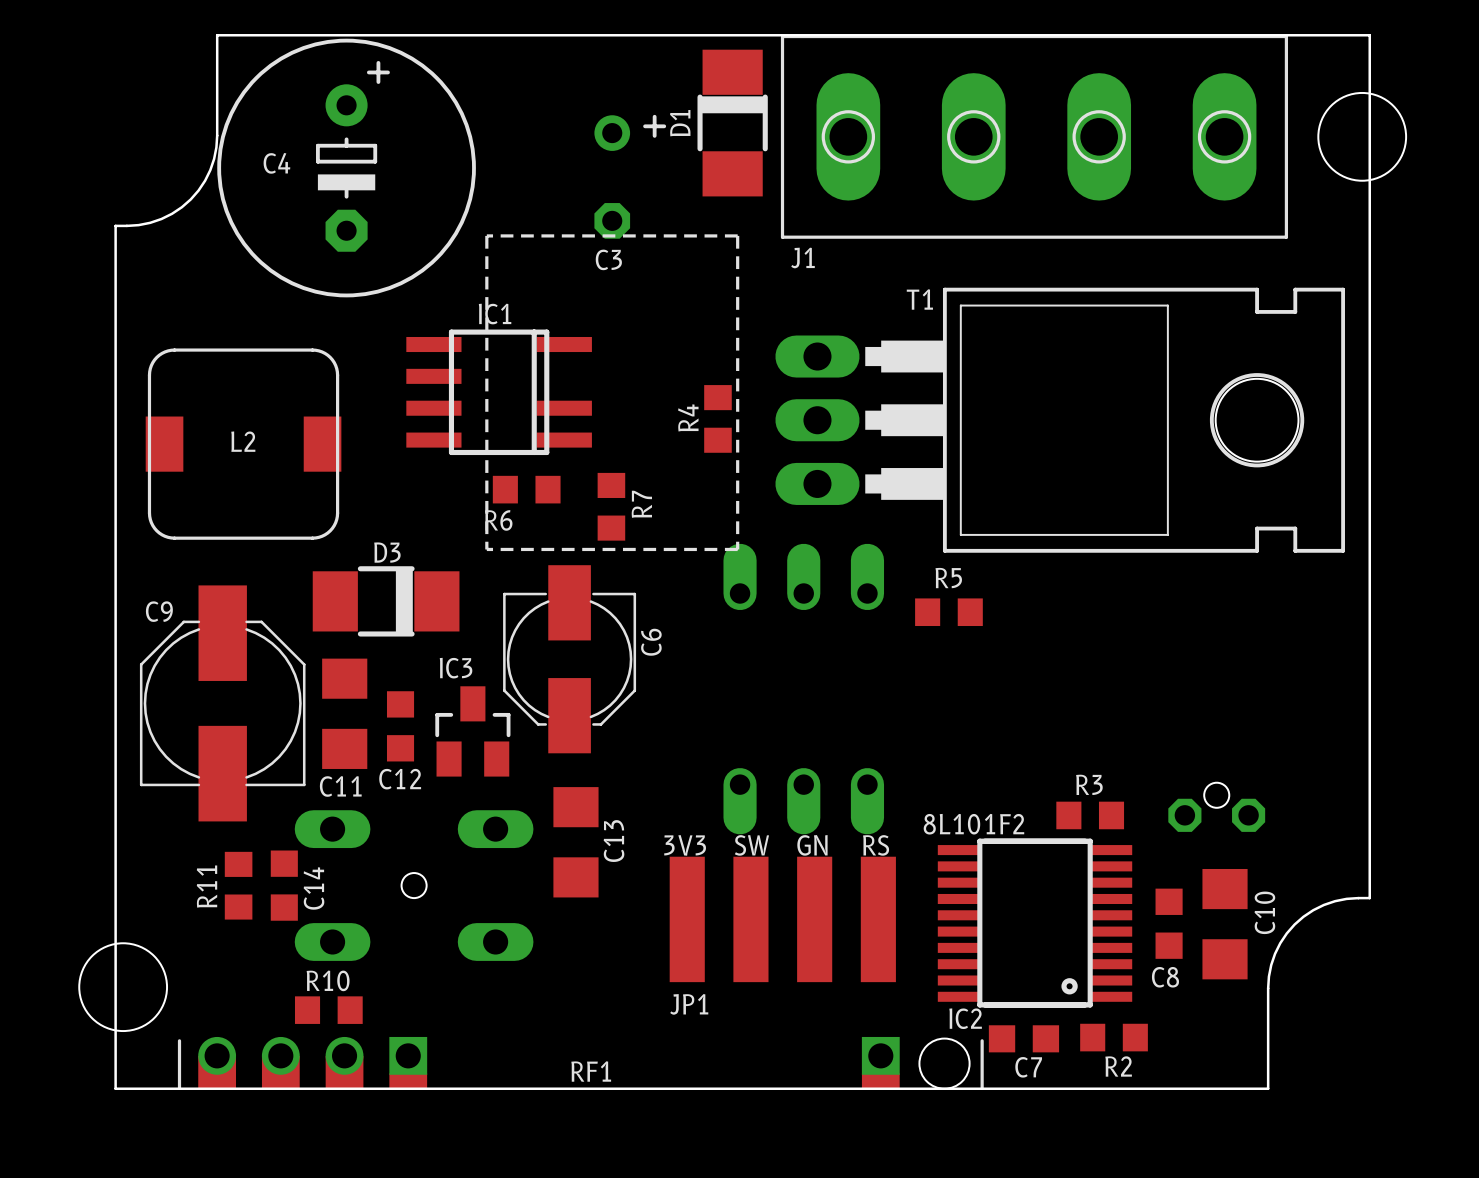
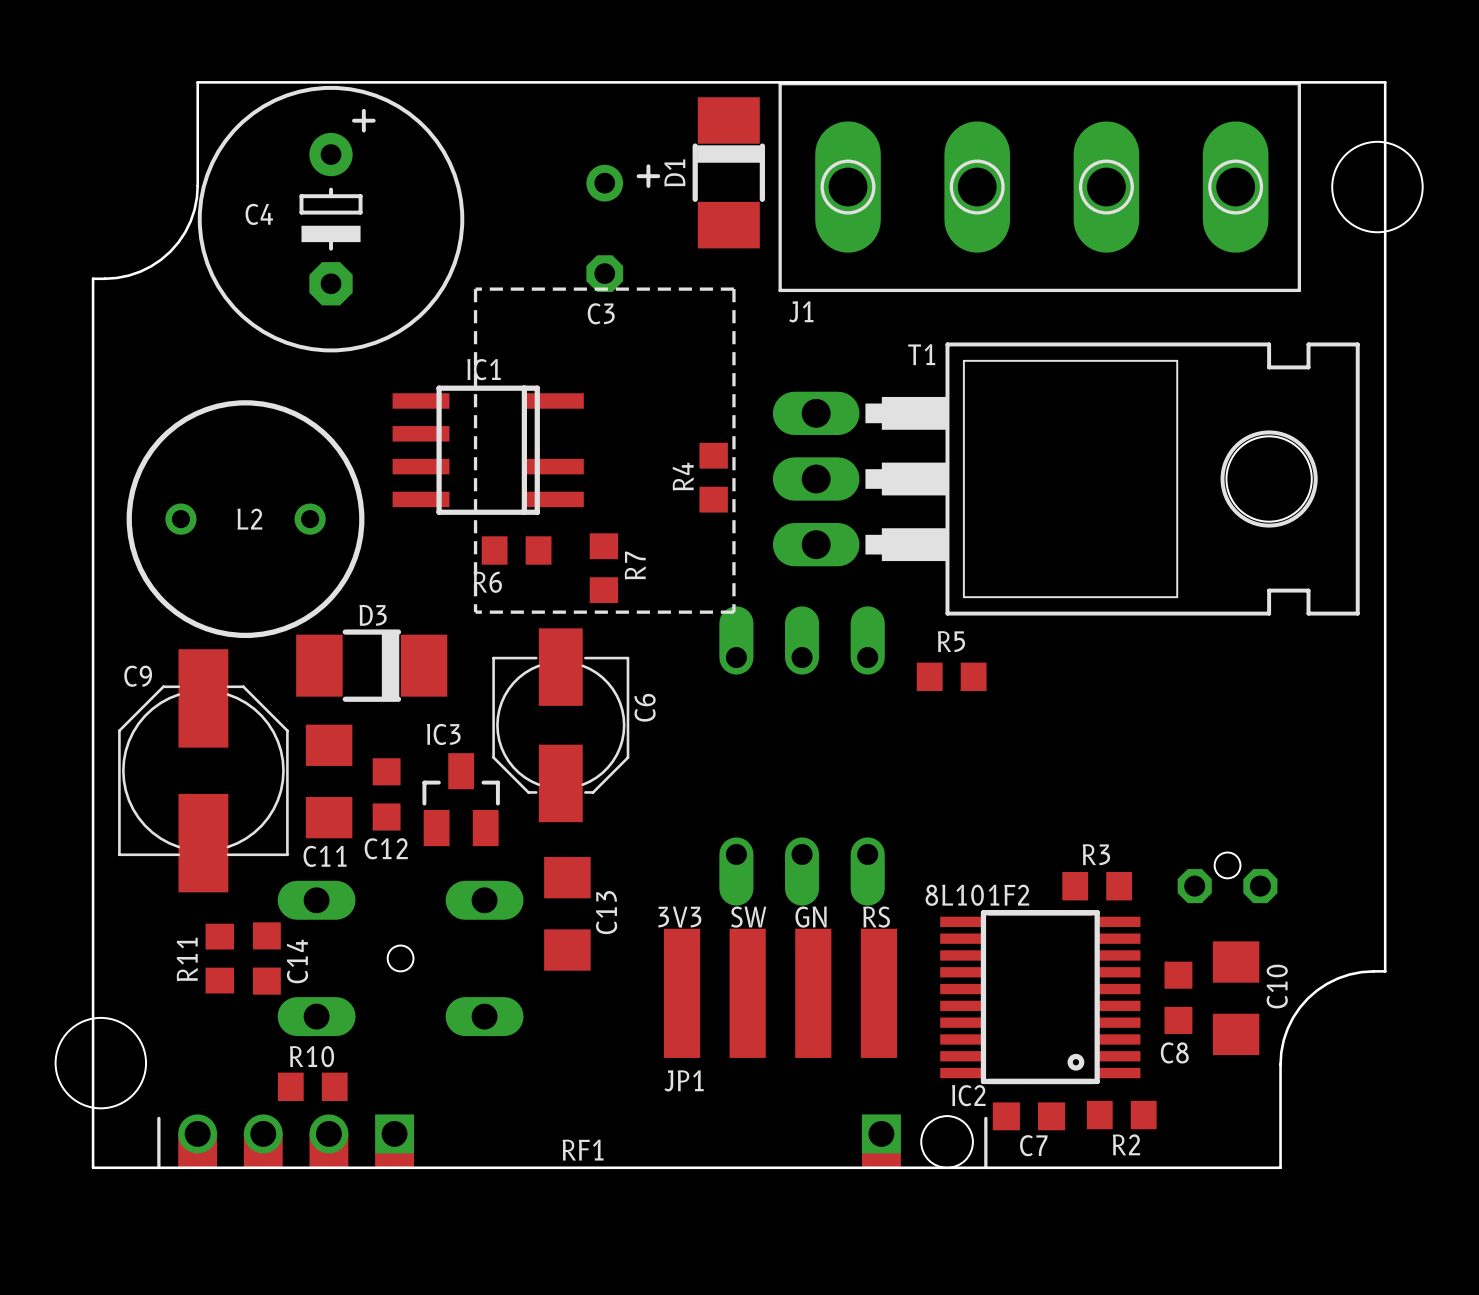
L2 footprint: [145, 348, 342, 540] -> [126, 400, 365, 639]

